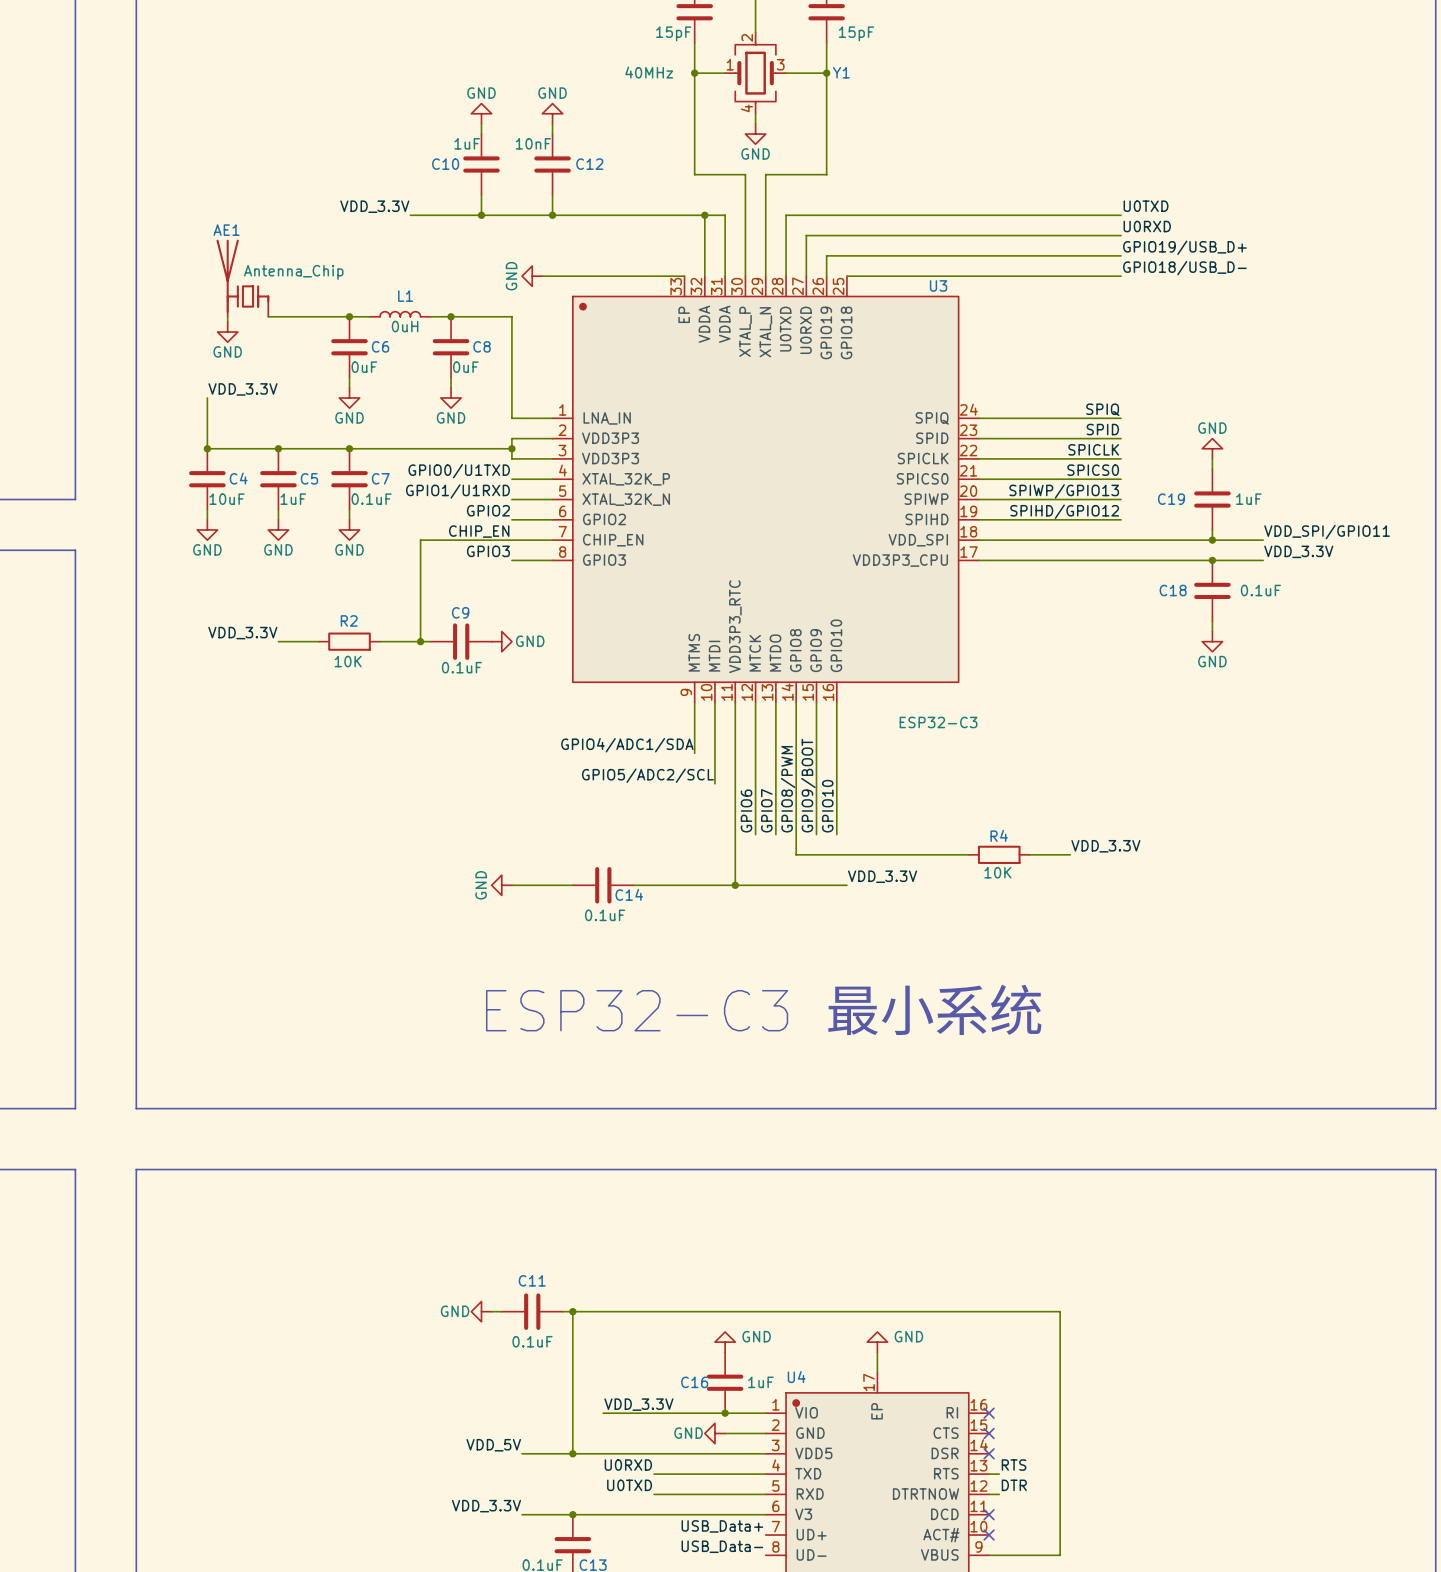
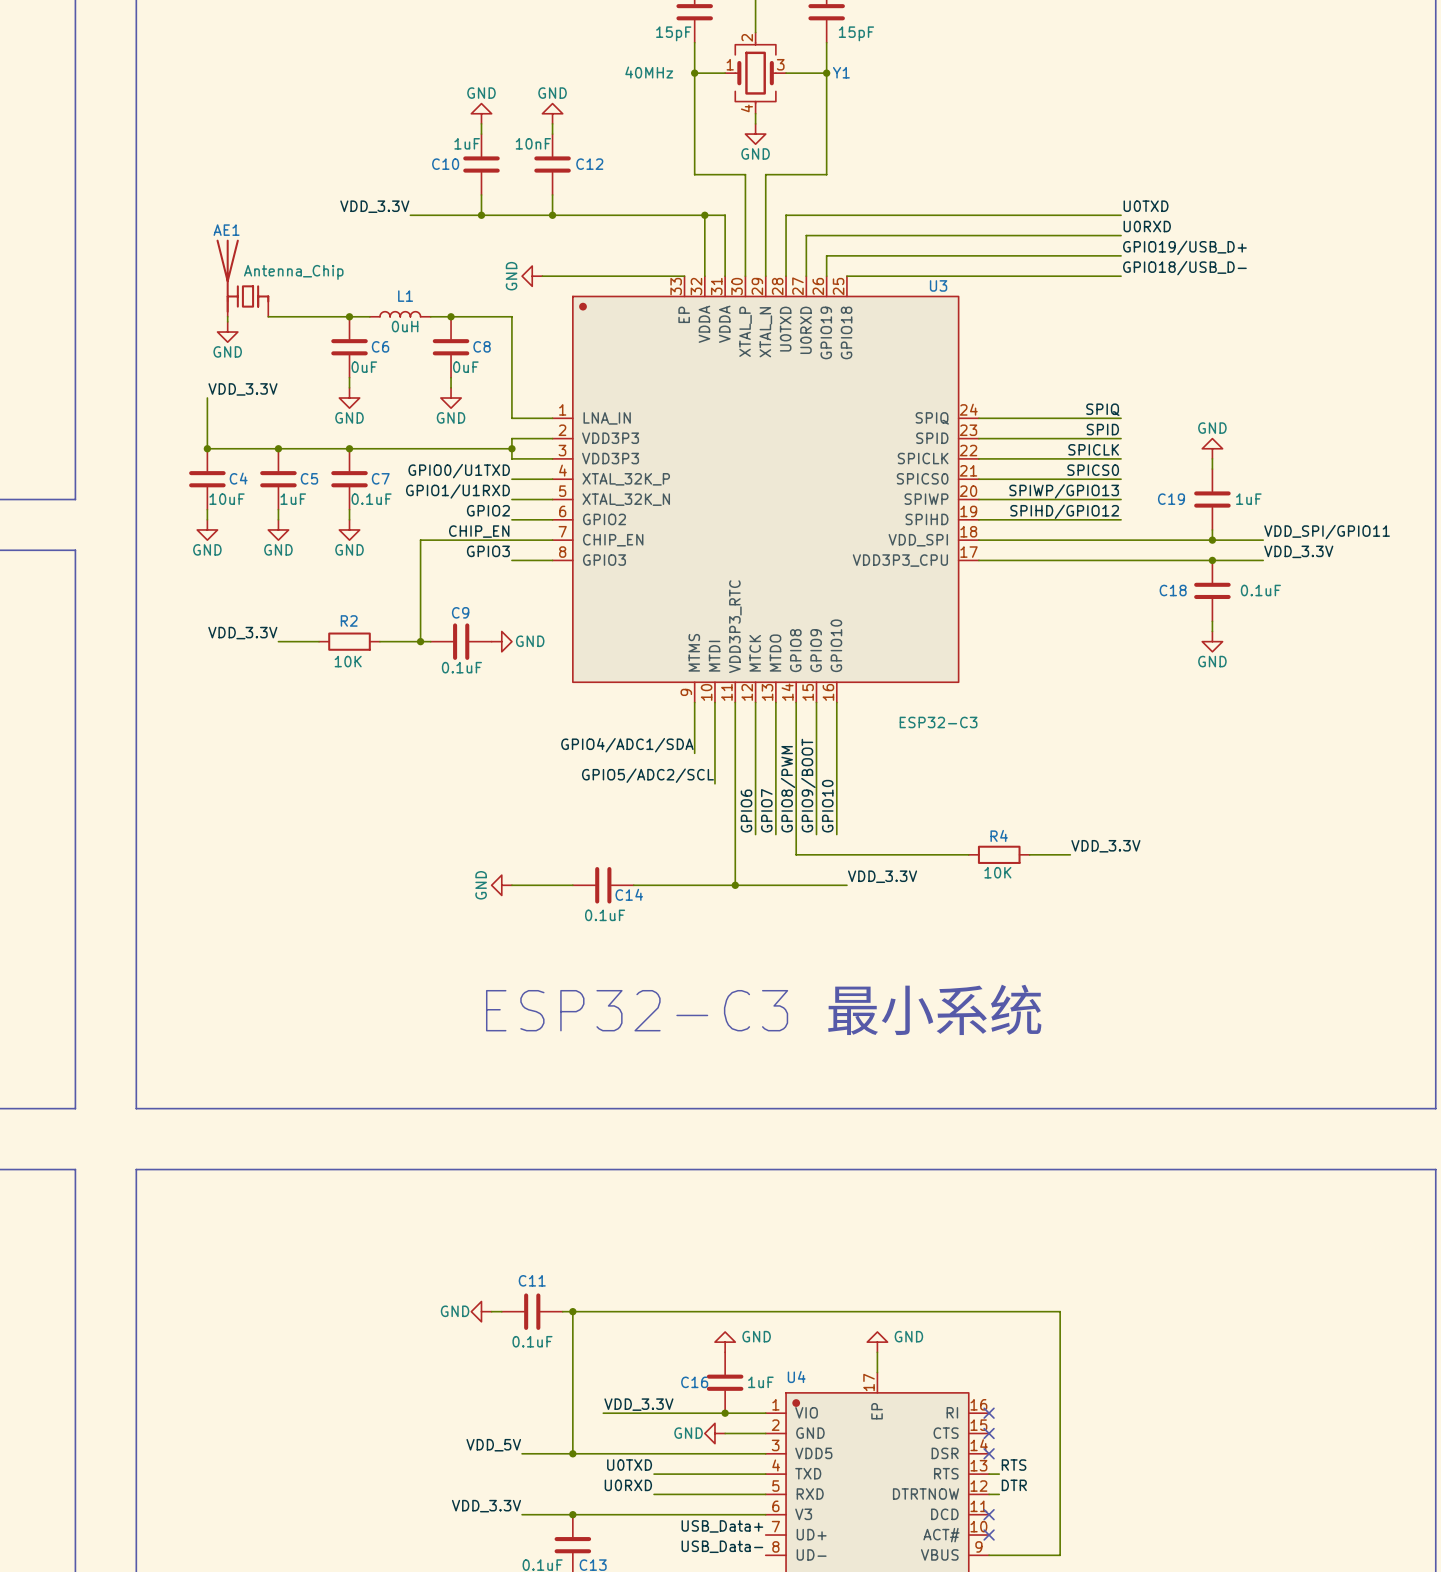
label: U0RXD (628, 1465) -> U0TXD (629, 1465)
label: U0TXD (629, 1485) -> U0RXD (628, 1485)

